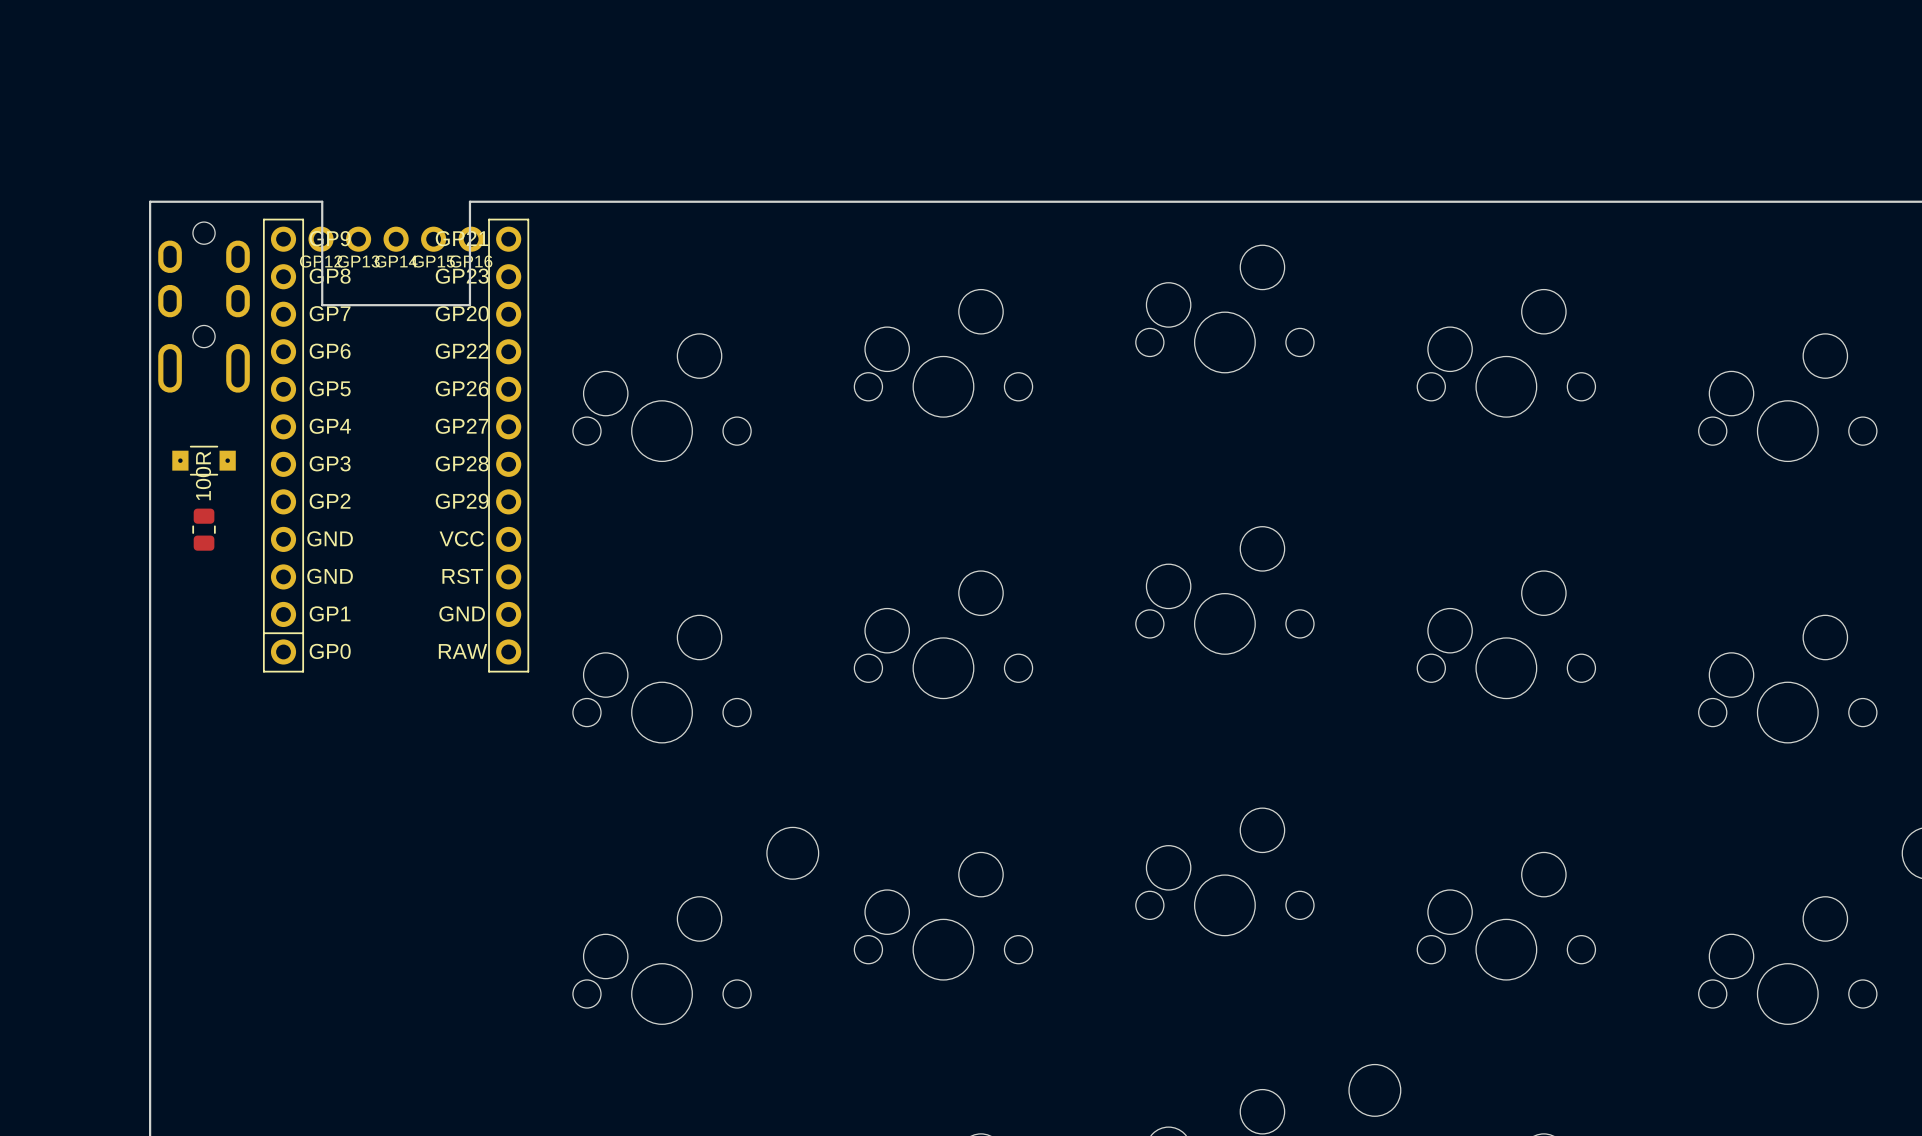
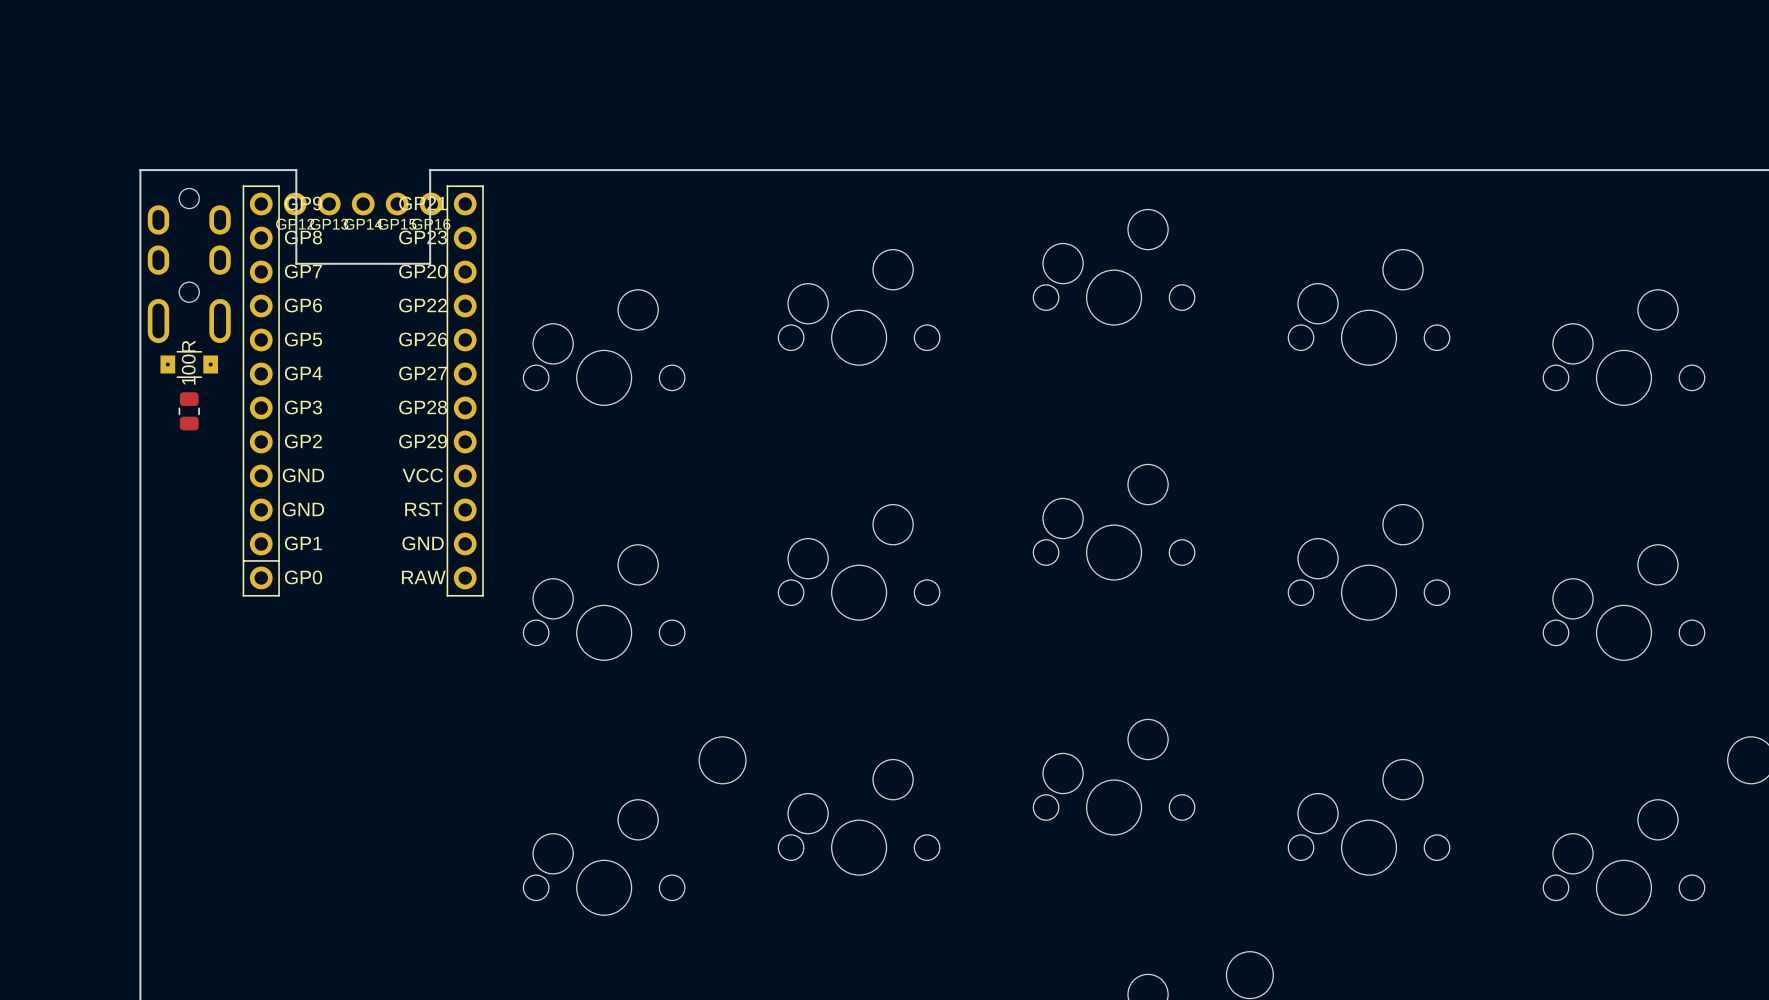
part: none -> (189, 364)
part footprint: [172, 445, 236, 476] -> [178, 392, 200, 431]
part: (204, 529) -> none

